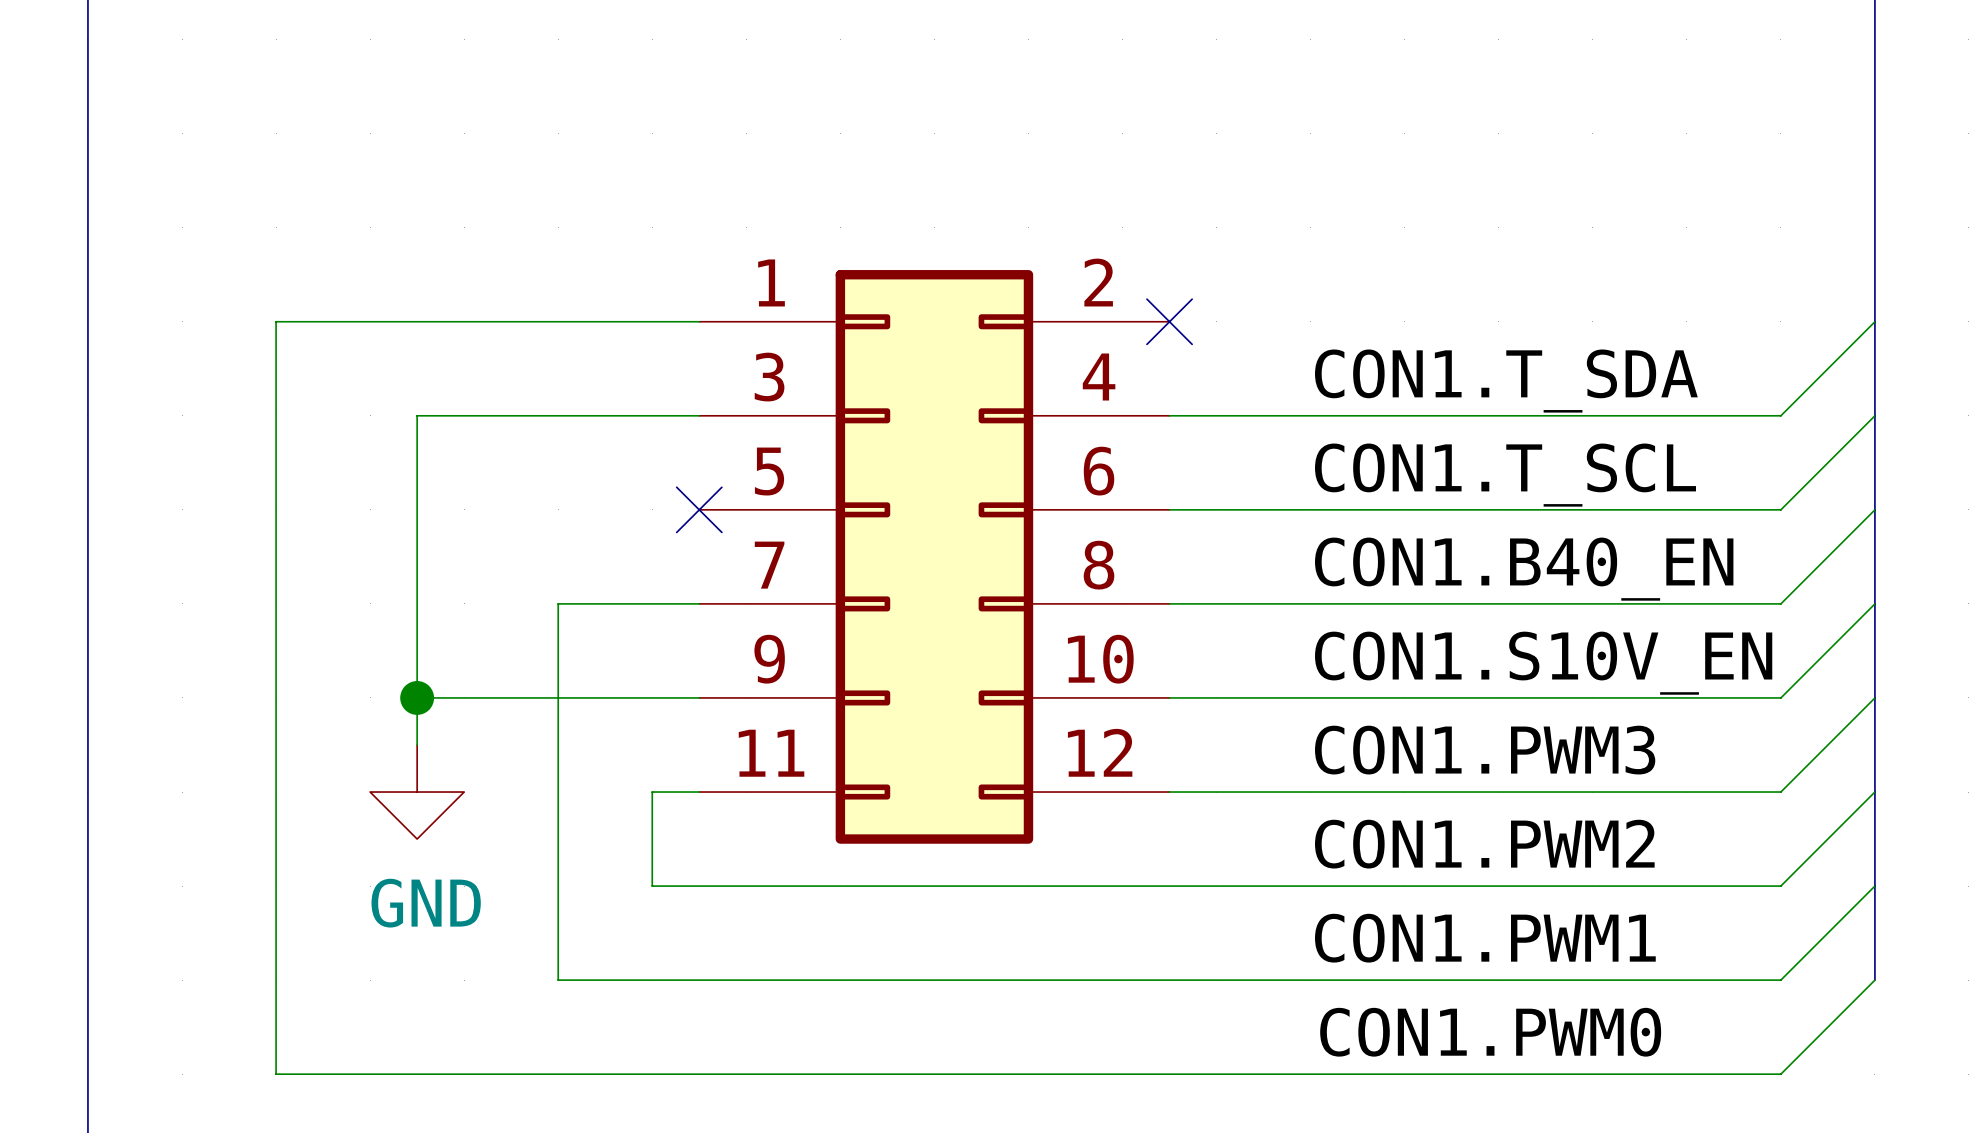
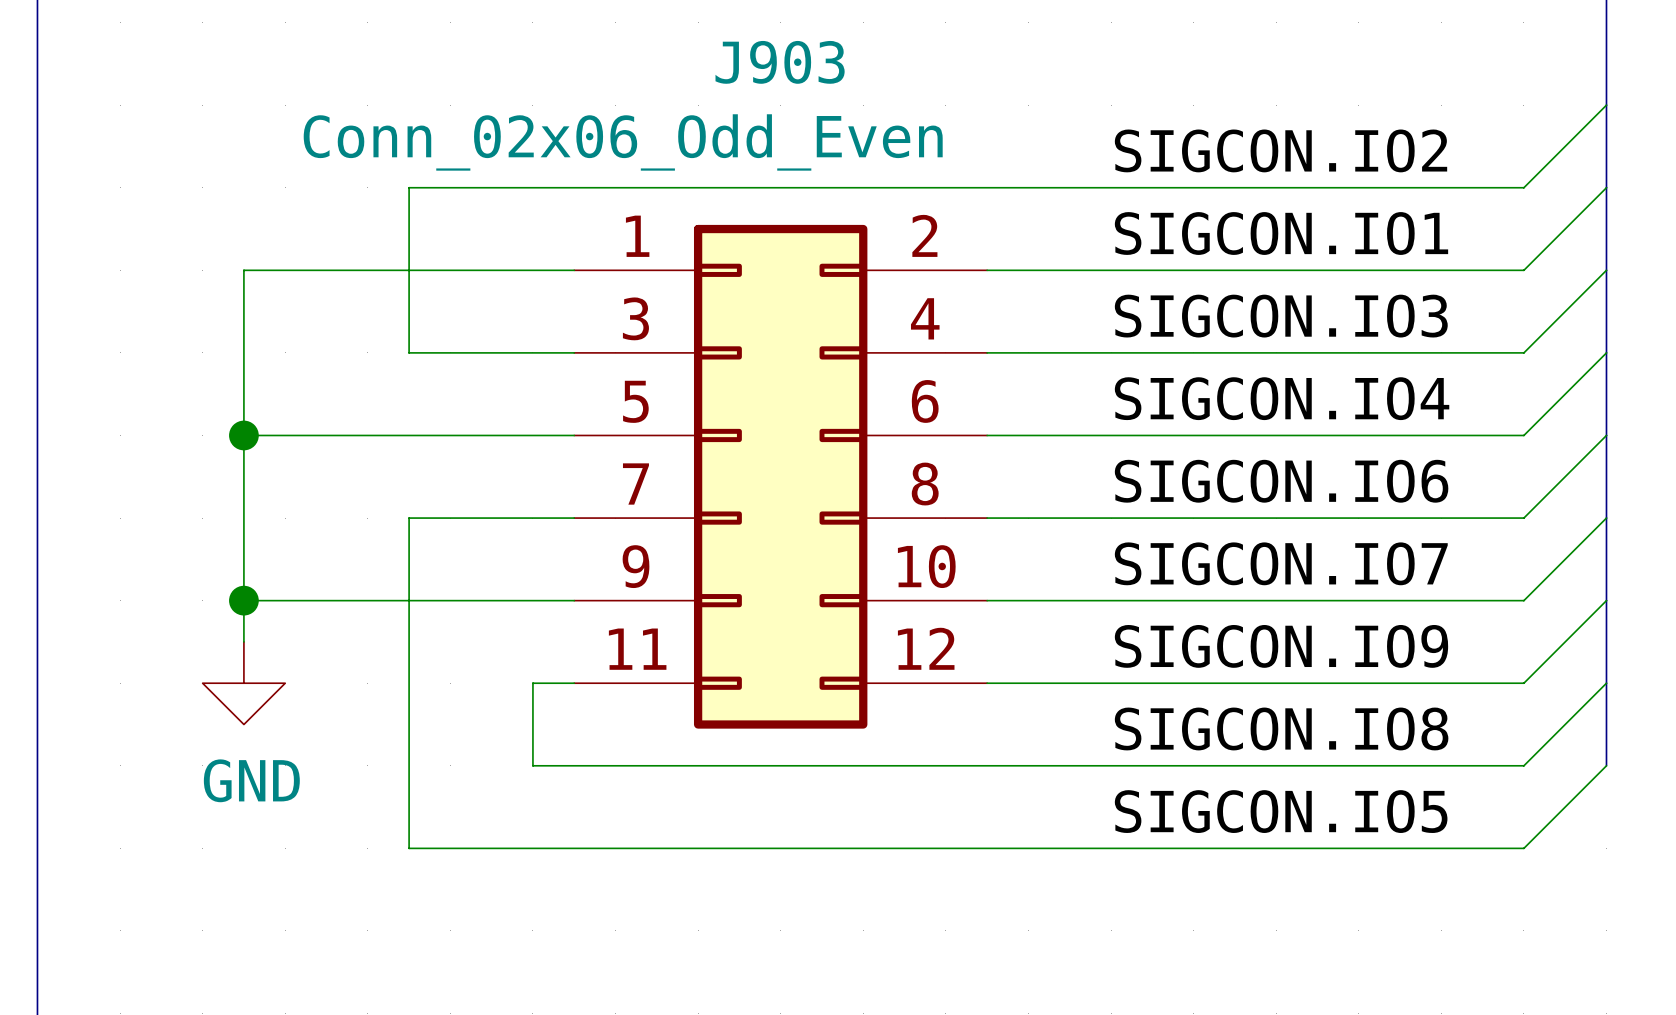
J903 name: none -> J903 (780, 62)
J903 value: none -> Conn_02x06_Odd_Even (623, 142)
label: none -> SIGCON.IO2 (1281, 150)
wire: none -> (1606, 187) (1523, 270) (987, 270)
label: none -> SIGCON.IO1 (1281, 233)
wire: (323, 321) (276, 321) (276, 1074) (1780, 1074) (1874, 980) -> (243, 270) (243, 641)
no-connect mark: (1169, 321) -> none
label: CON1.T_SDA (1506, 381) -> SIGCON.IO3 (1281, 316)
wire: (511, 415) (417, 415) (417, 744) -> (409, 352) (409, 187) (1523, 187) (1606, 105)
label: CON1.T_SCL (1505, 475) -> SIGCON.IO4 (1282, 398)
wire: none -> (243, 435) (574, 435)
junction: none -> (243, 435)
no-connect mark: (699, 509) -> none
label: CON1.B40_EN (1524, 569) -> SIGCON.IO6 (1281, 481)
wire: (558, 603) (558, 980) -> (450, 518) (409, 518) (409, 848) (450, 848)
label: CON1.S10V_EN (1543, 663) -> SIGCON.IO7 (1281, 563)
wire: none -> (243, 600) (326, 600)
junction position: (417, 697) -> (243, 600)
label: CON1.PWM3 (1485, 750) -> SIGCON.IO9 (1281, 646)
power symbol position: GND (417, 792) -> GND (243, 683)
label: CON1.PWM2 (1484, 844) -> SIGCON.IO8 (1281, 728)
bus: (1874, 886) (1874, 980) -> none
label: CON1.PWM1 (1485, 938) -> SIGCON.IO5 (1281, 811)
label: CON1.PWM0 (1490, 1032) -> none

